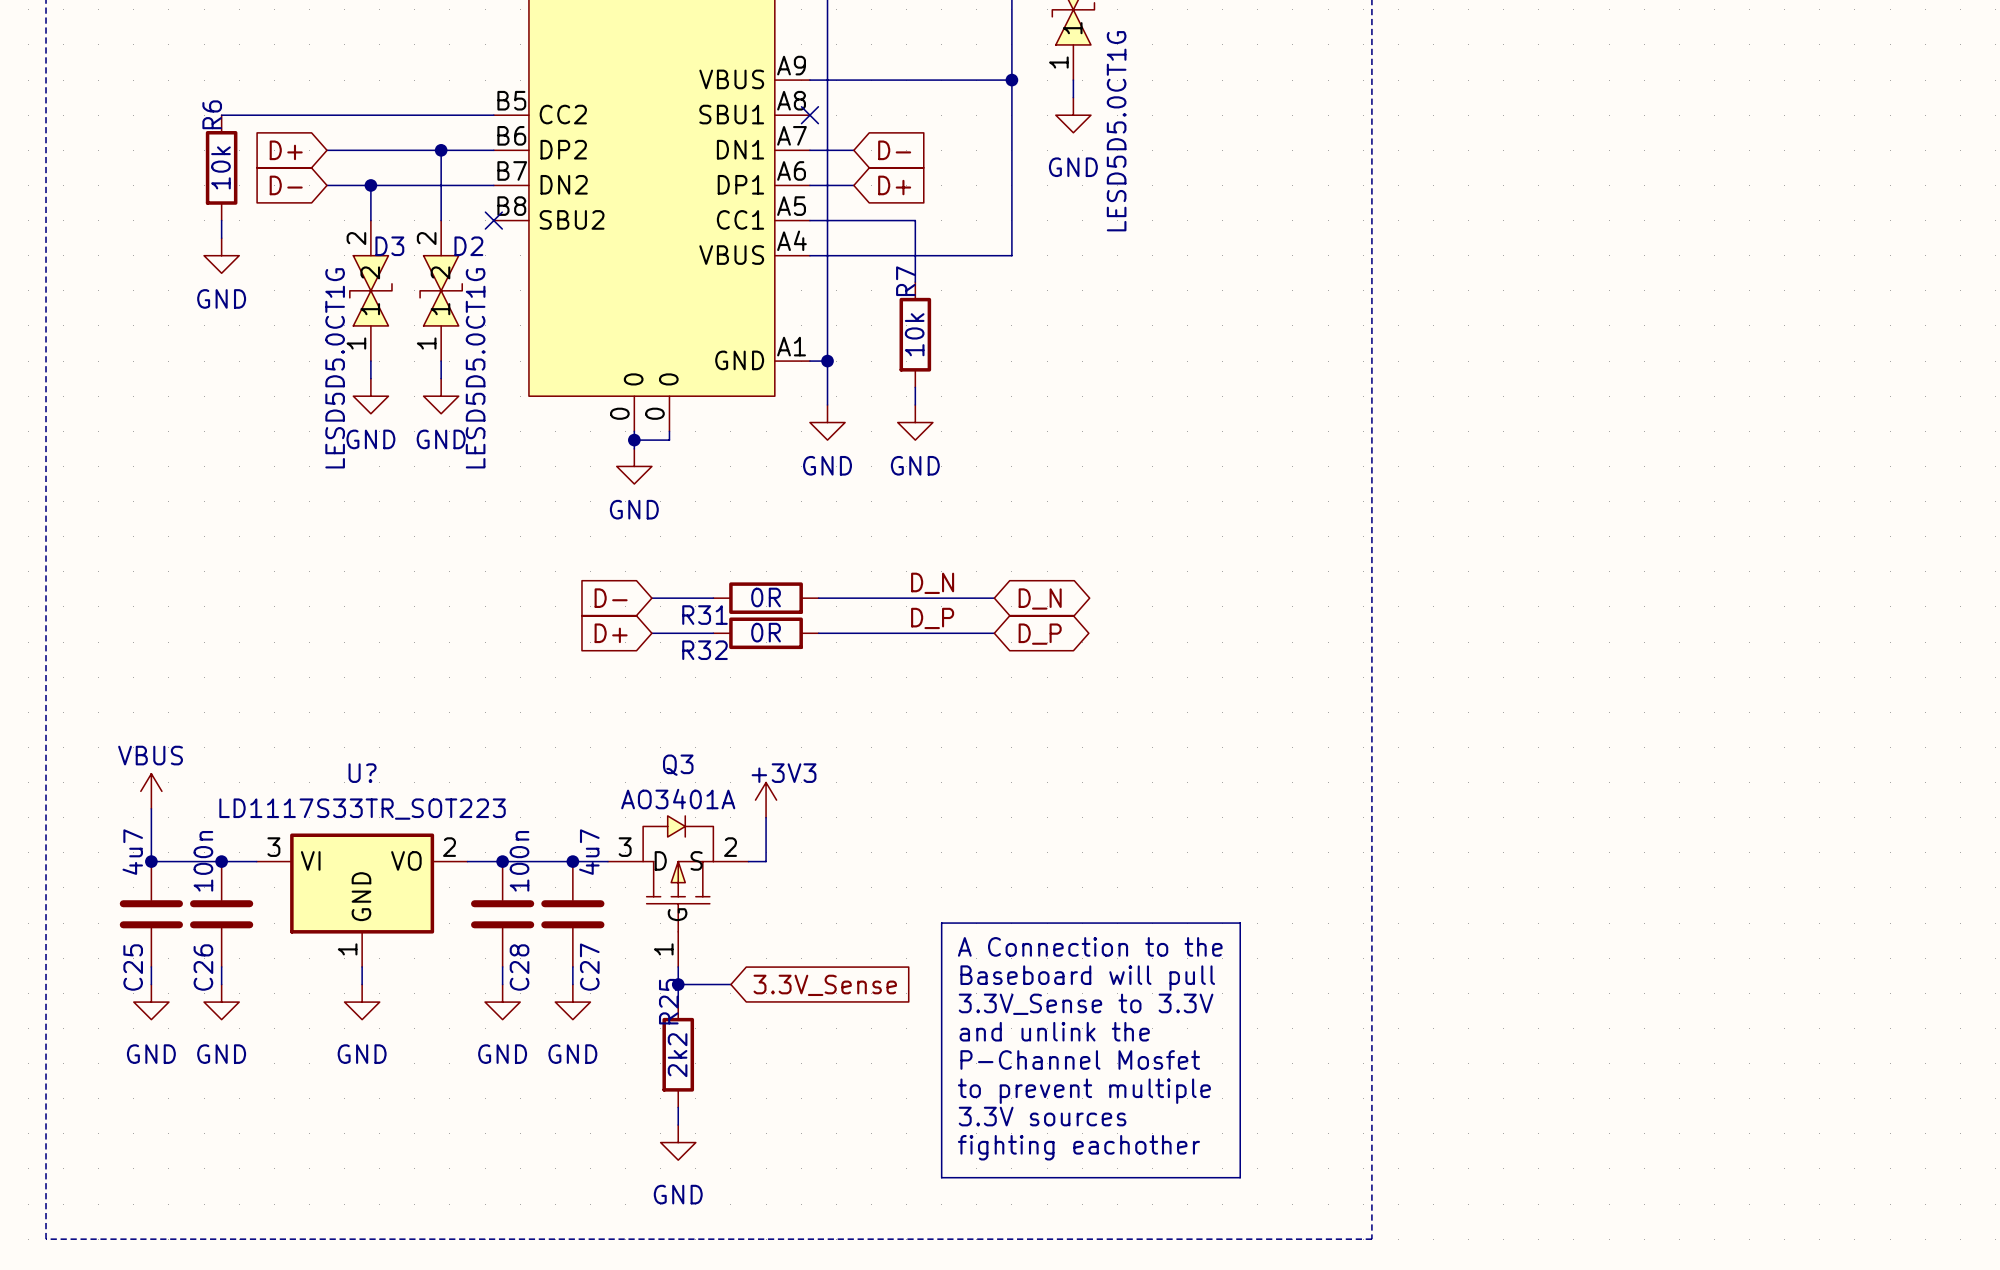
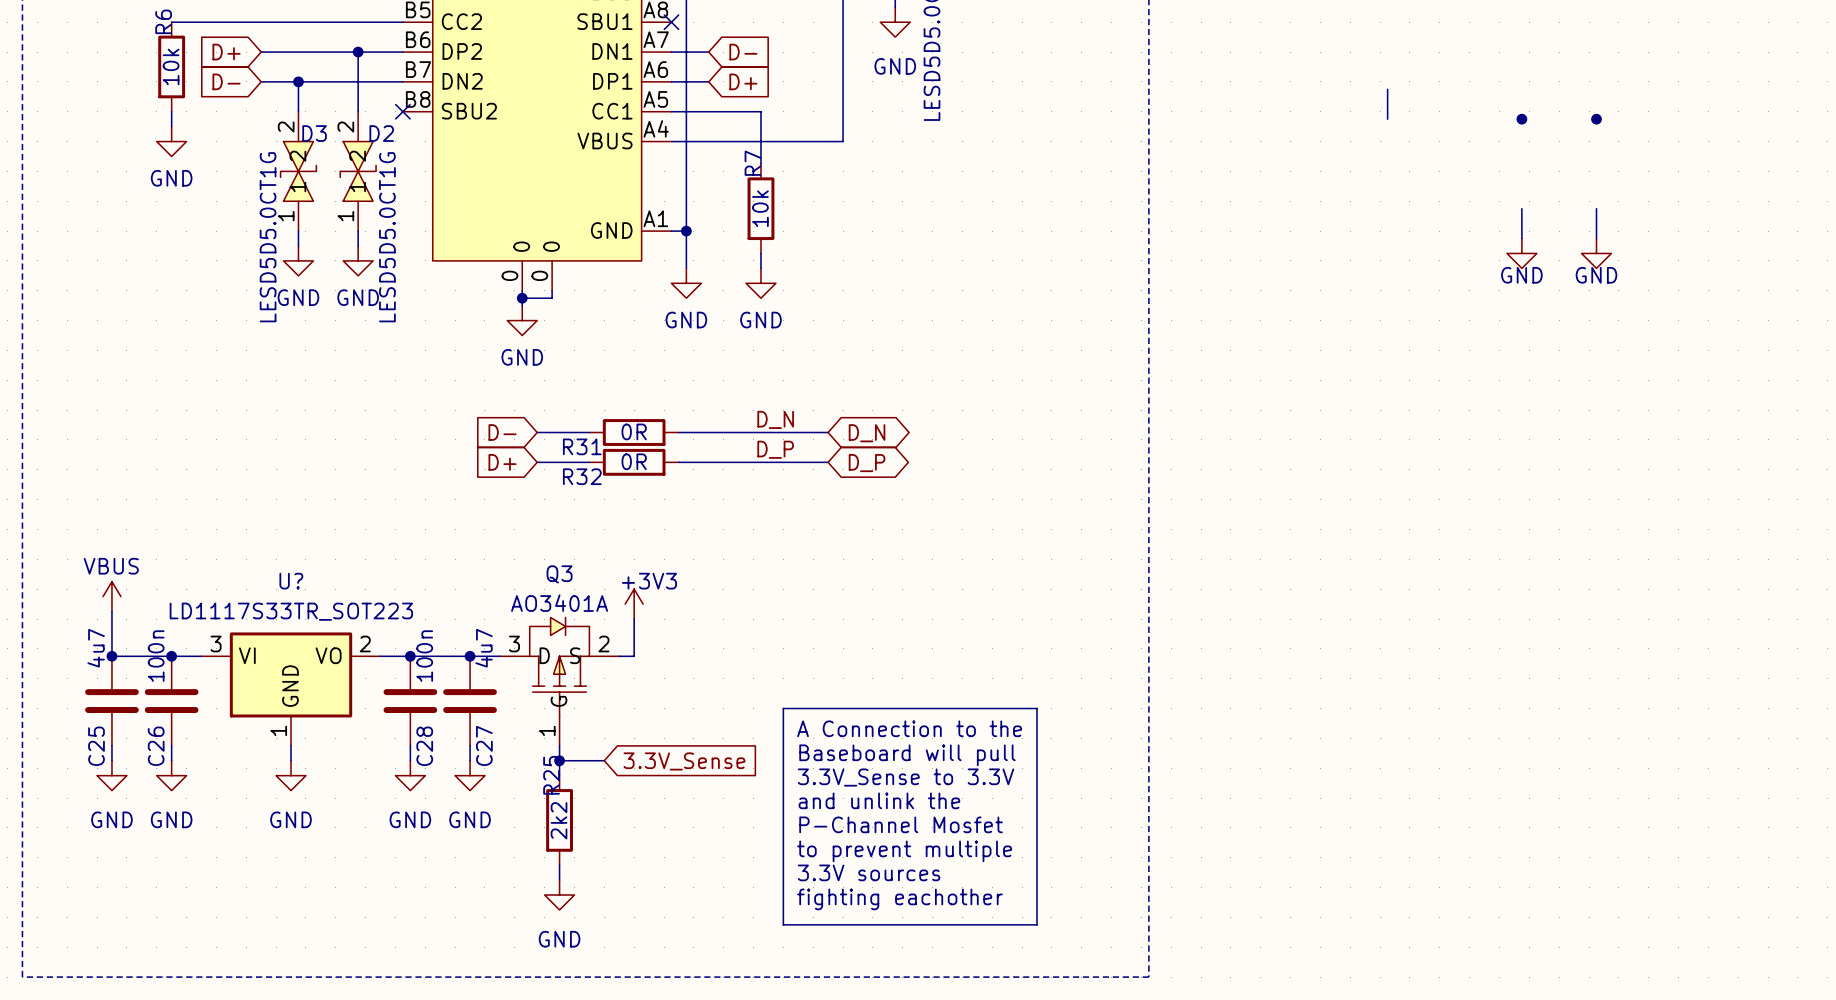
wire: none -> (1387, 89) (1387, 119)
junction: none -> (1521, 119)
junction: none -> (1596, 119)
wire: none -> (1521, 208) (1521, 238)
wire: none -> (1596, 208) (1596, 238)
power symbol: none -> GND (1521, 253)
power symbol: none -> GND (1596, 253)

